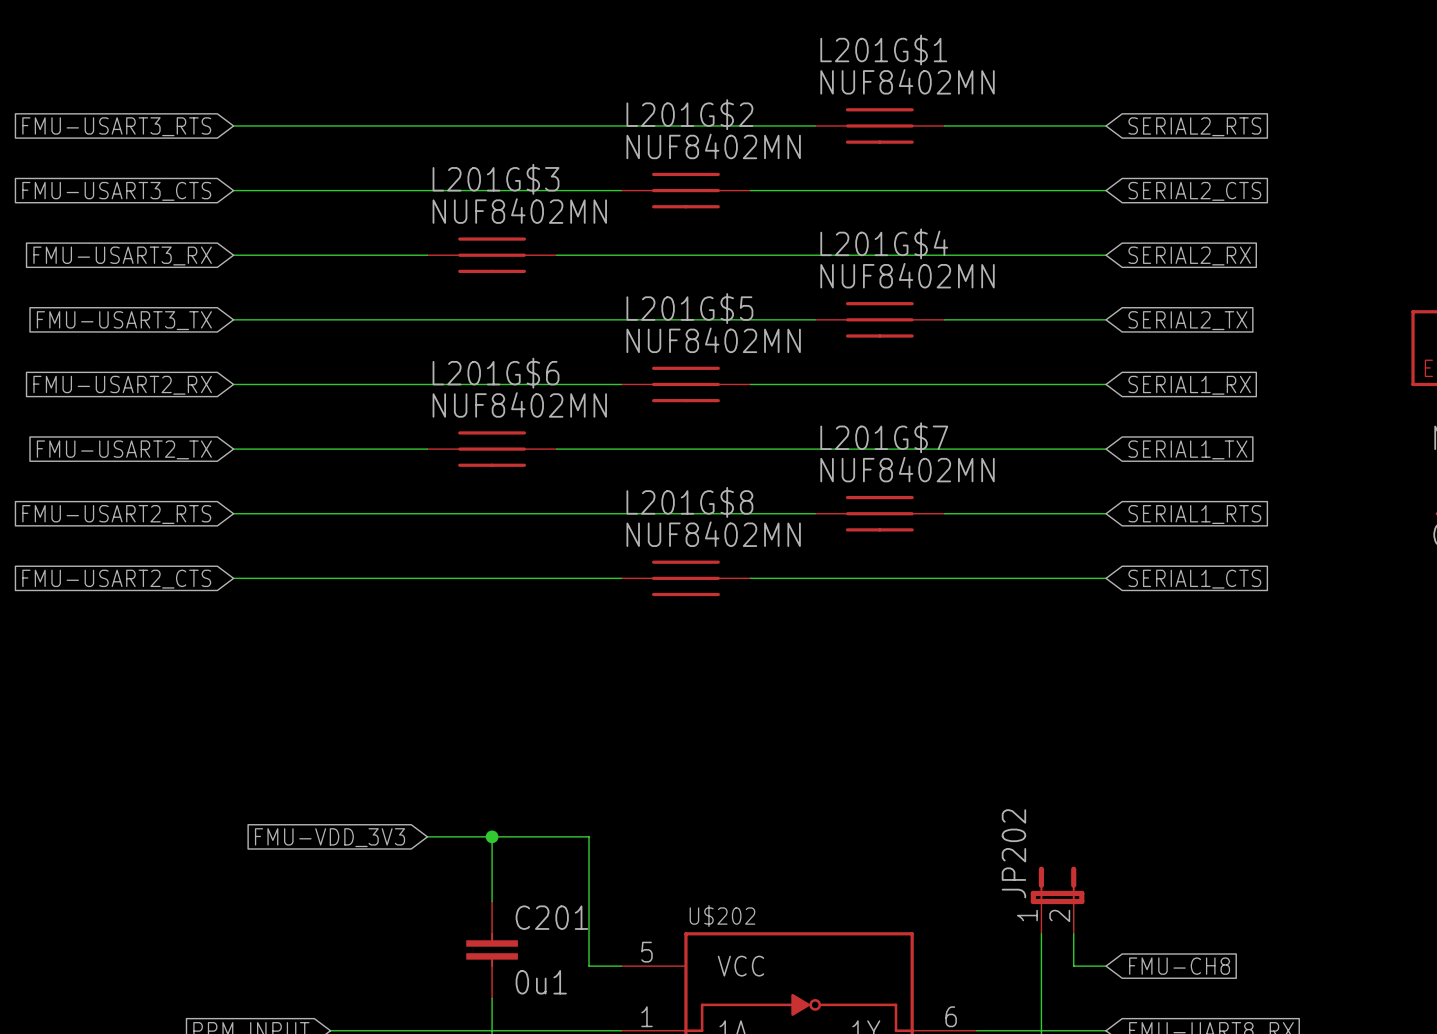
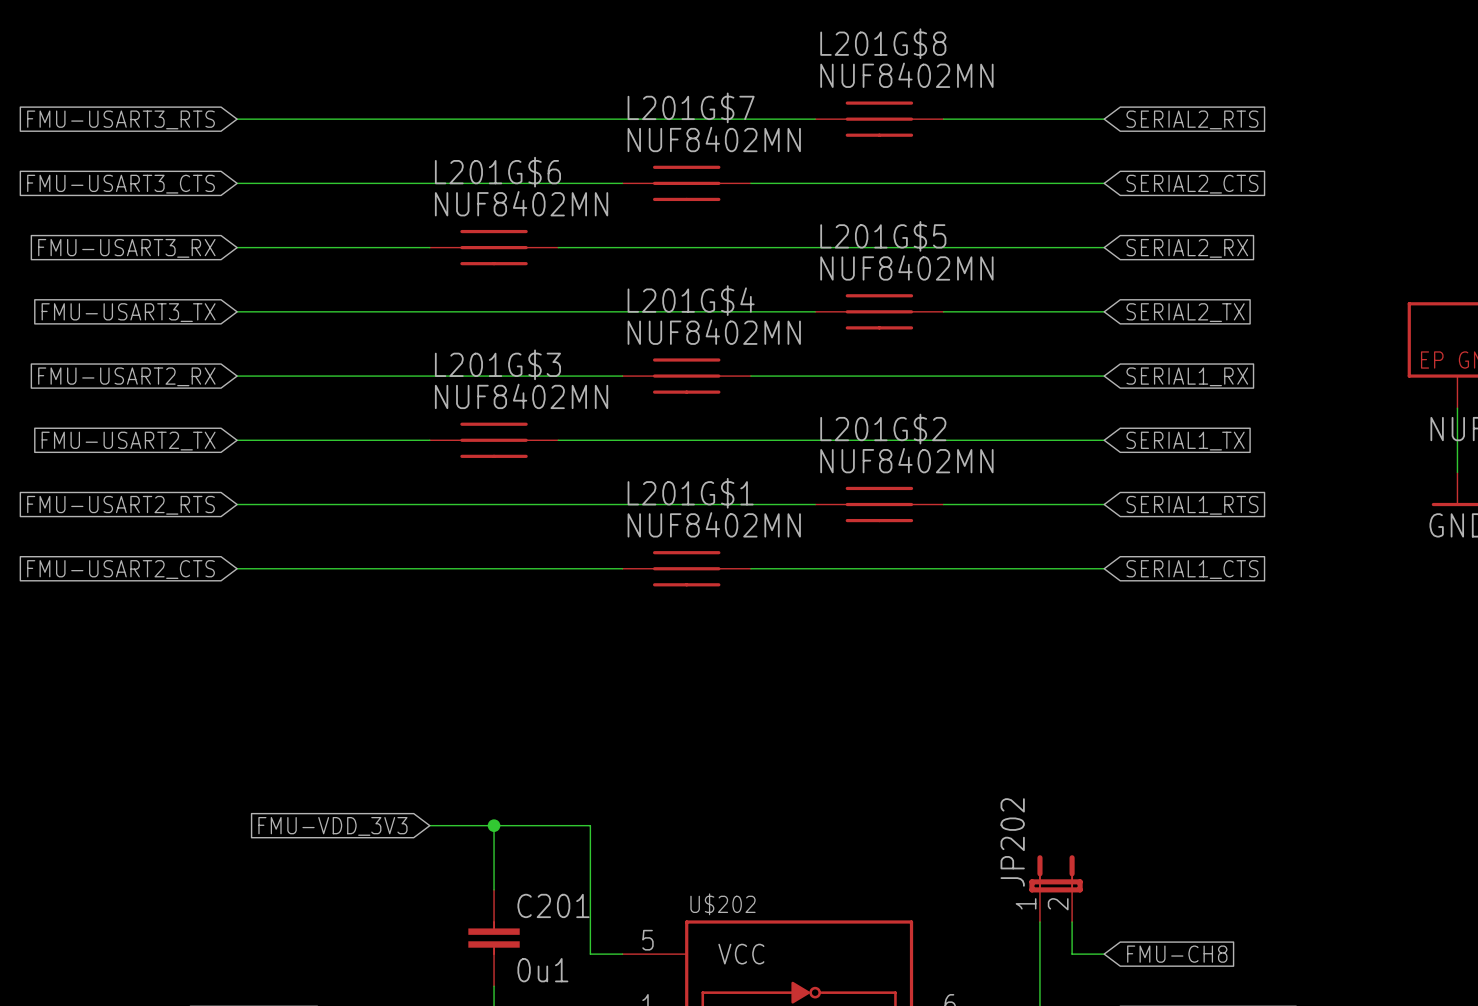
L201G$1 name: L201G$1 (883, 50) -> L201G$8 (883, 43)
L201G$2 name: L201G$2 (689, 114) -> L201G$7 (691, 107)
L201G$3 name: L201G$3 (496, 179) -> L201G$6 (497, 172)
L201G$4 name: L201G$4 (884, 243) -> L201G$5 (883, 236)
L201G$5 name: L201G$5 (689, 308) -> L201G$4 (691, 300)
L201G$6 name: L201G$6 (496, 373) -> L201G$3 (497, 364)
L201G$7 name: L201G$7 (884, 437) -> L201G$2 (883, 429)
L201G$8 name: L201G$8 (689, 502) -> L201G$1 (690, 493)

